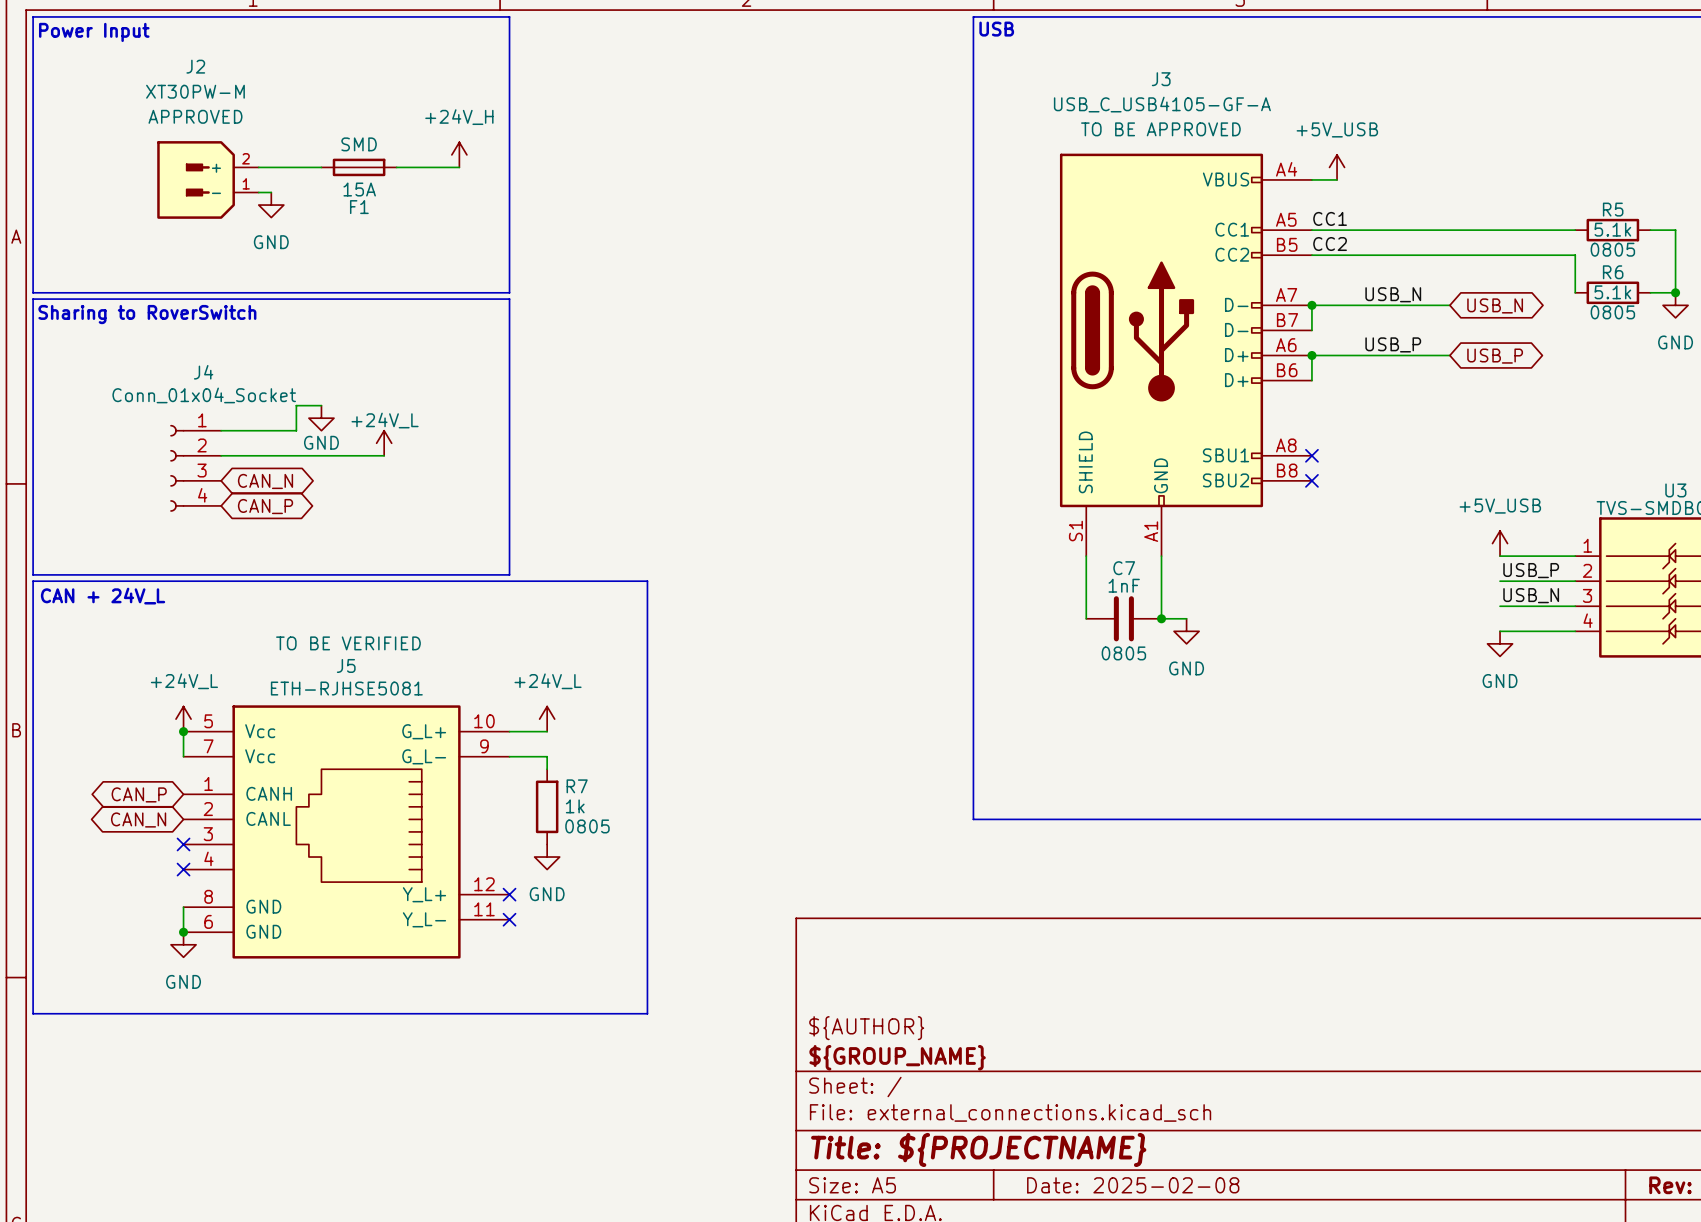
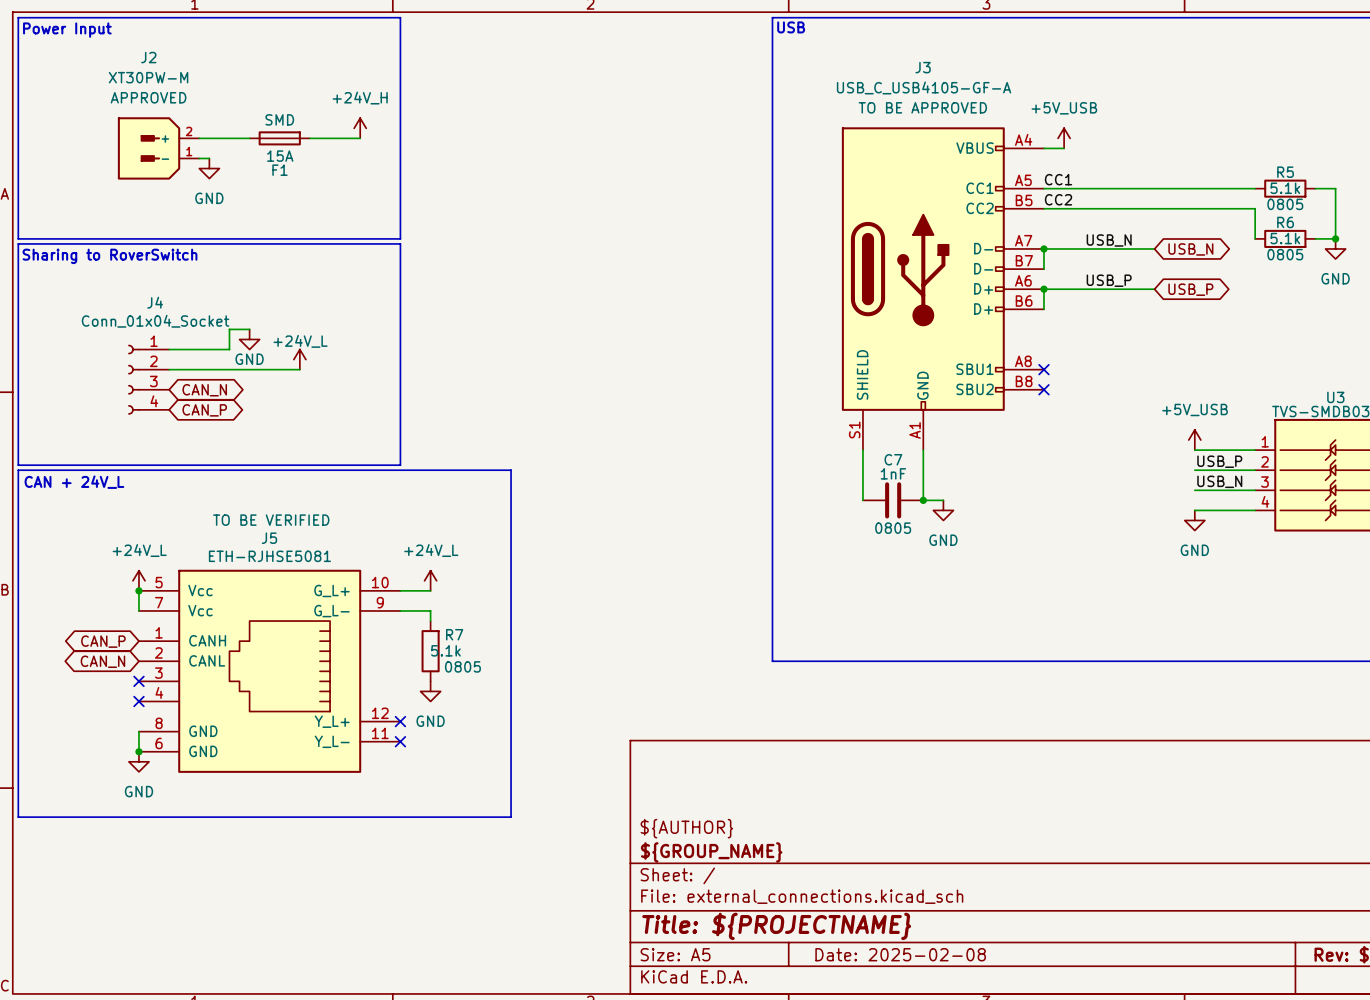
R7 value: 1k (575, 806) -> 5.1k (445, 650)

